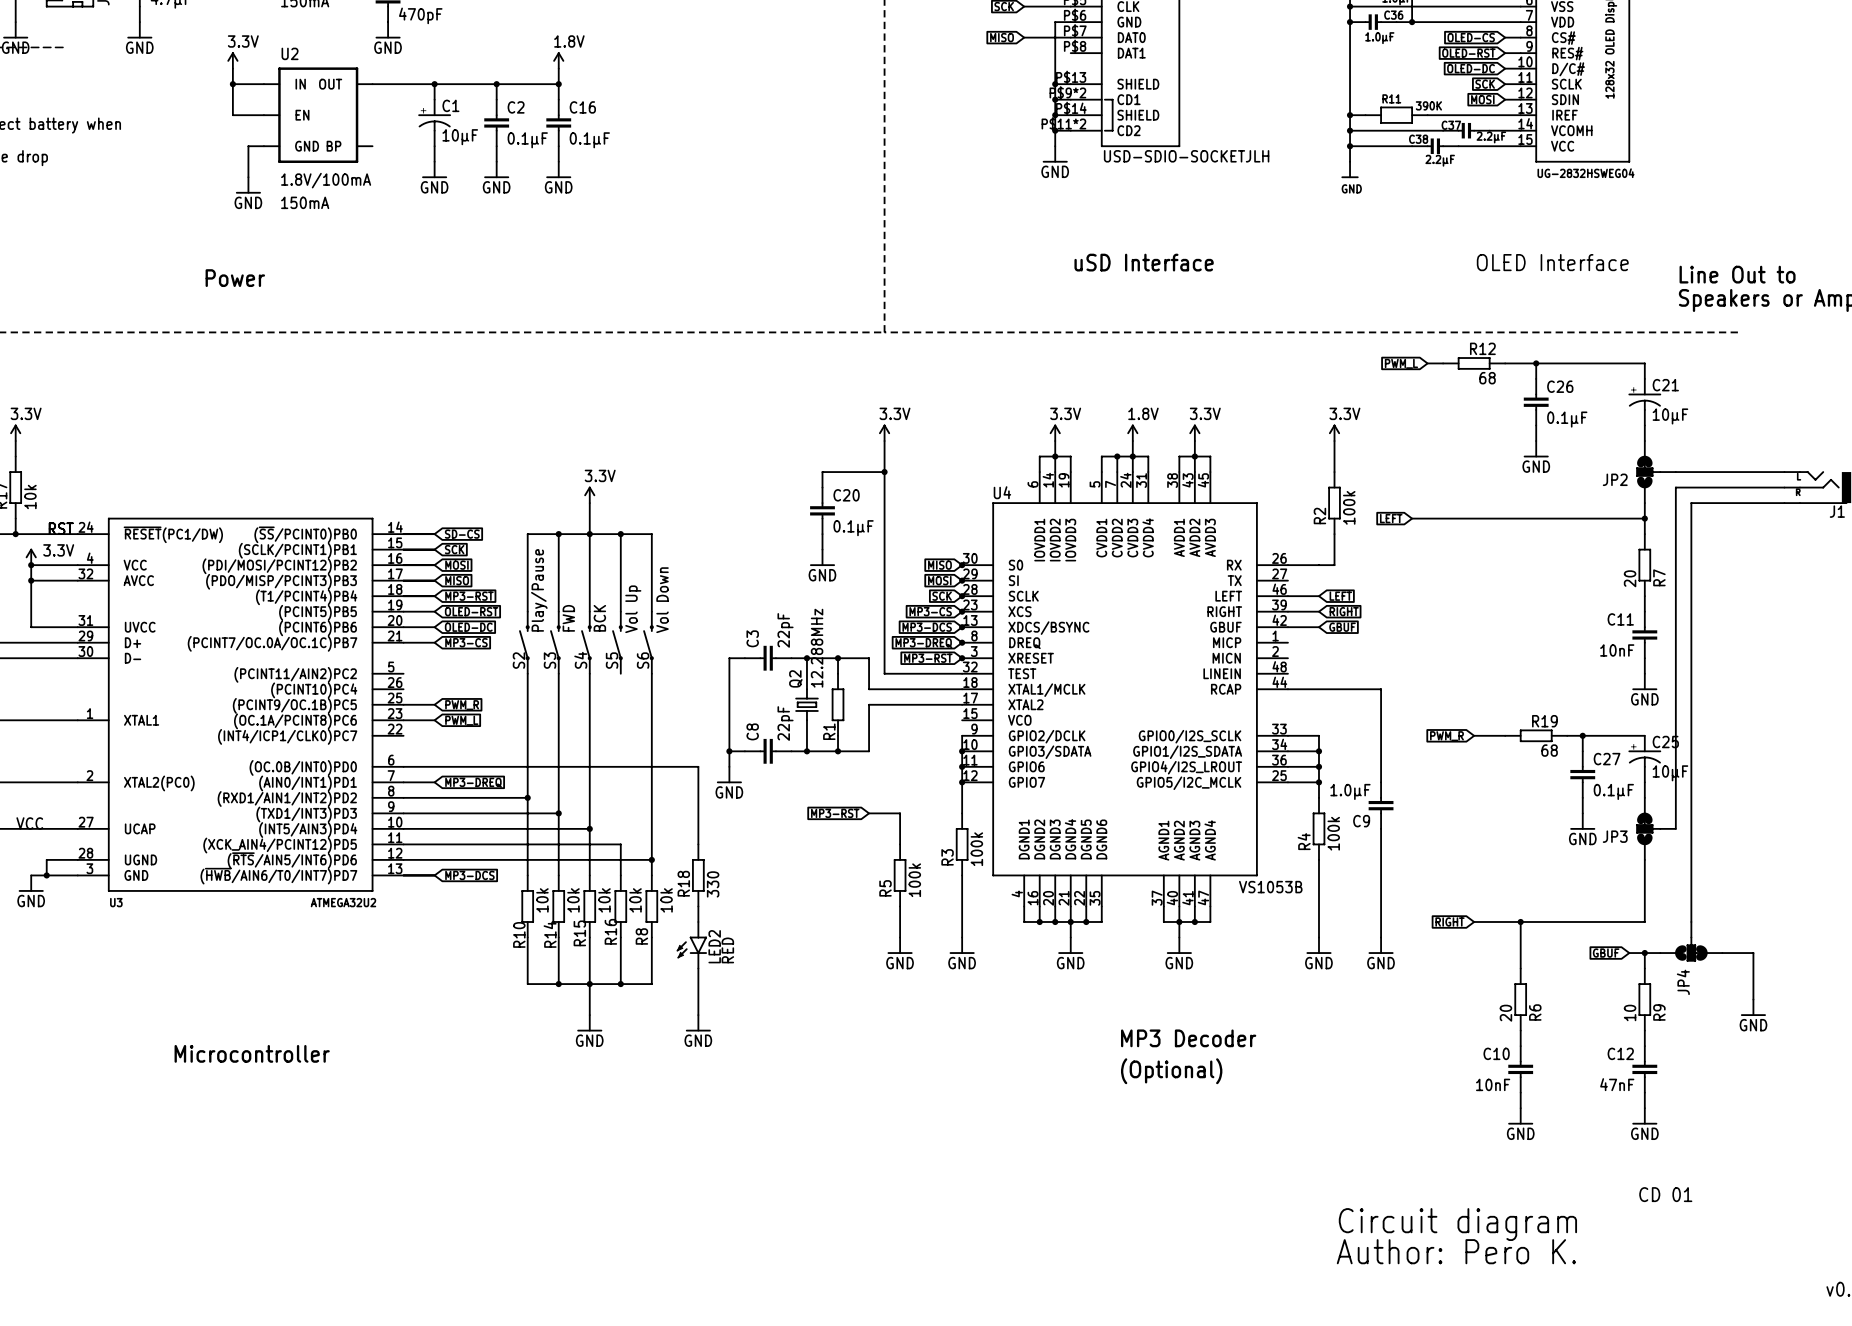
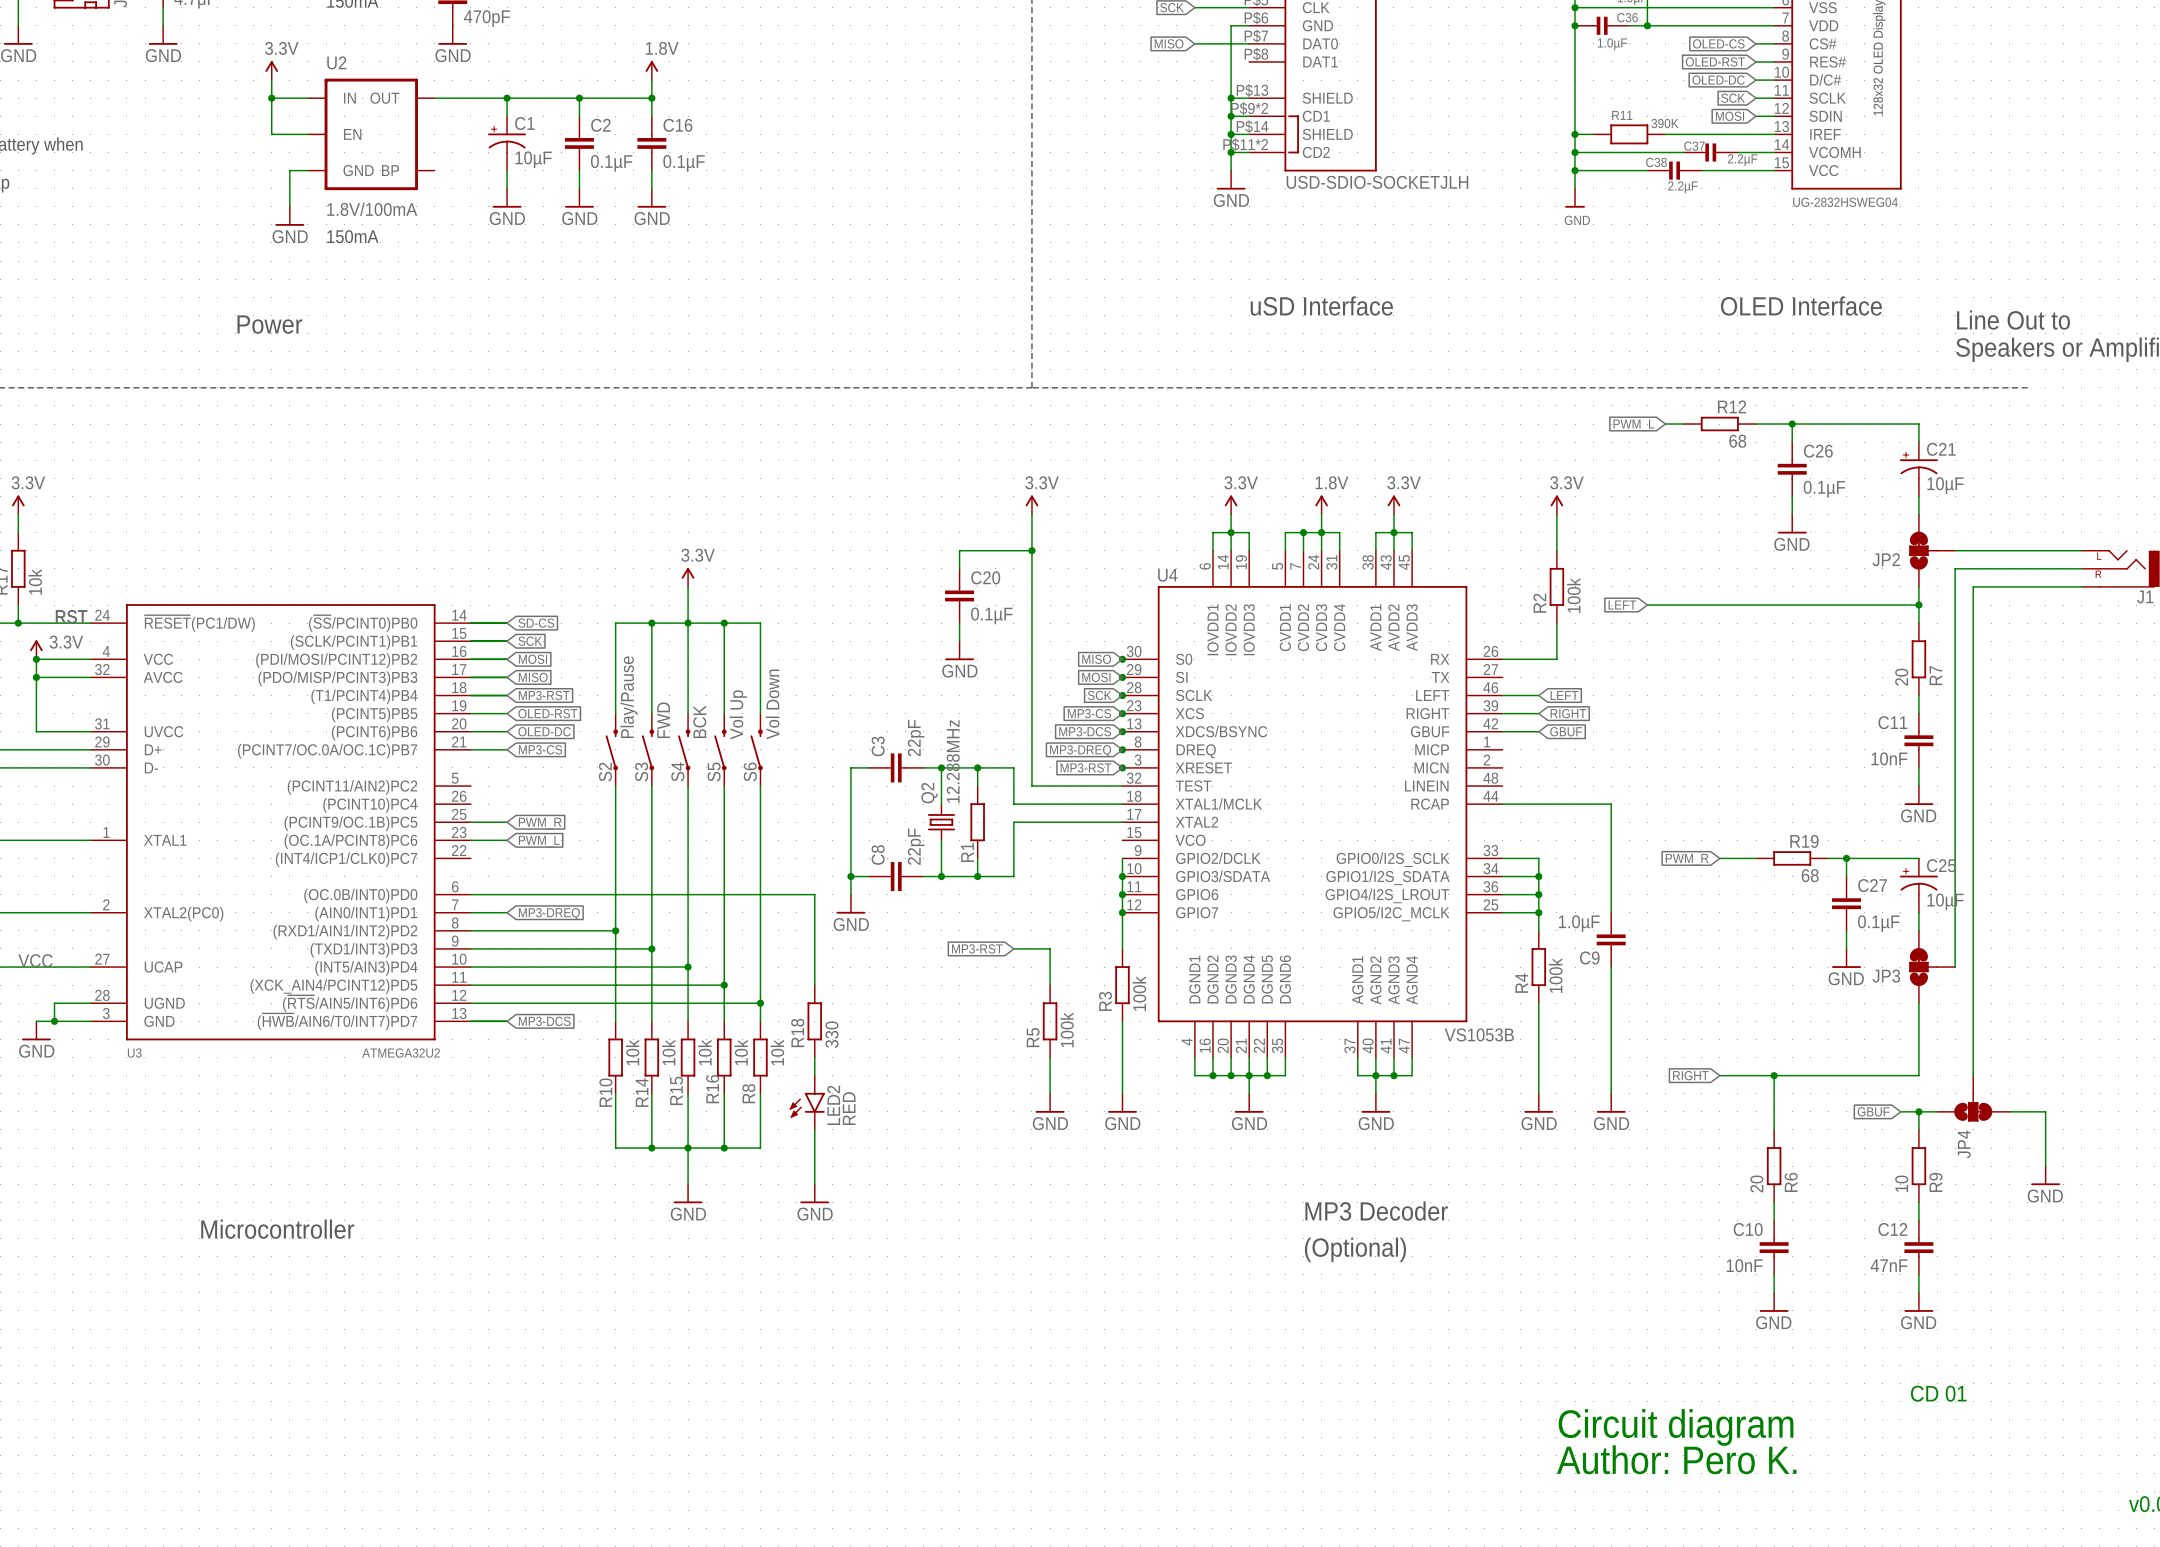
wire: none -> (724, 786) (724, 985)
junction: none -> (724, 985)

